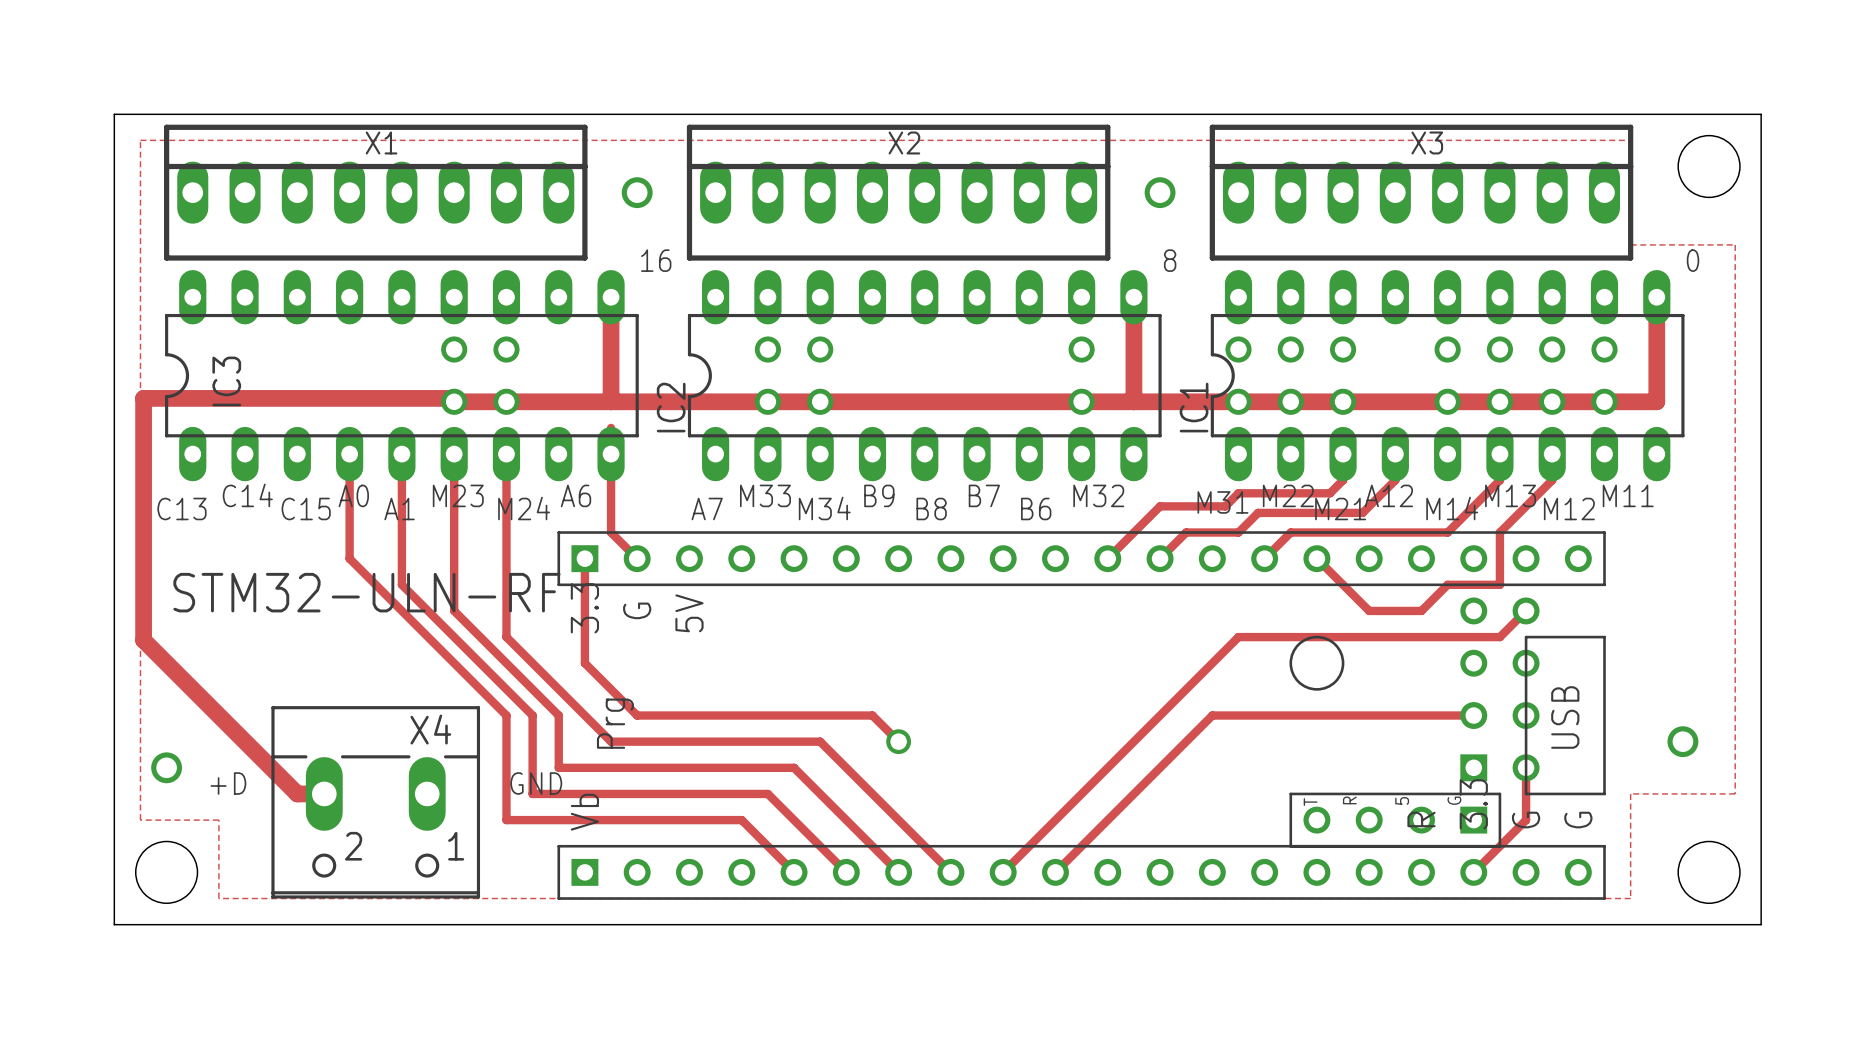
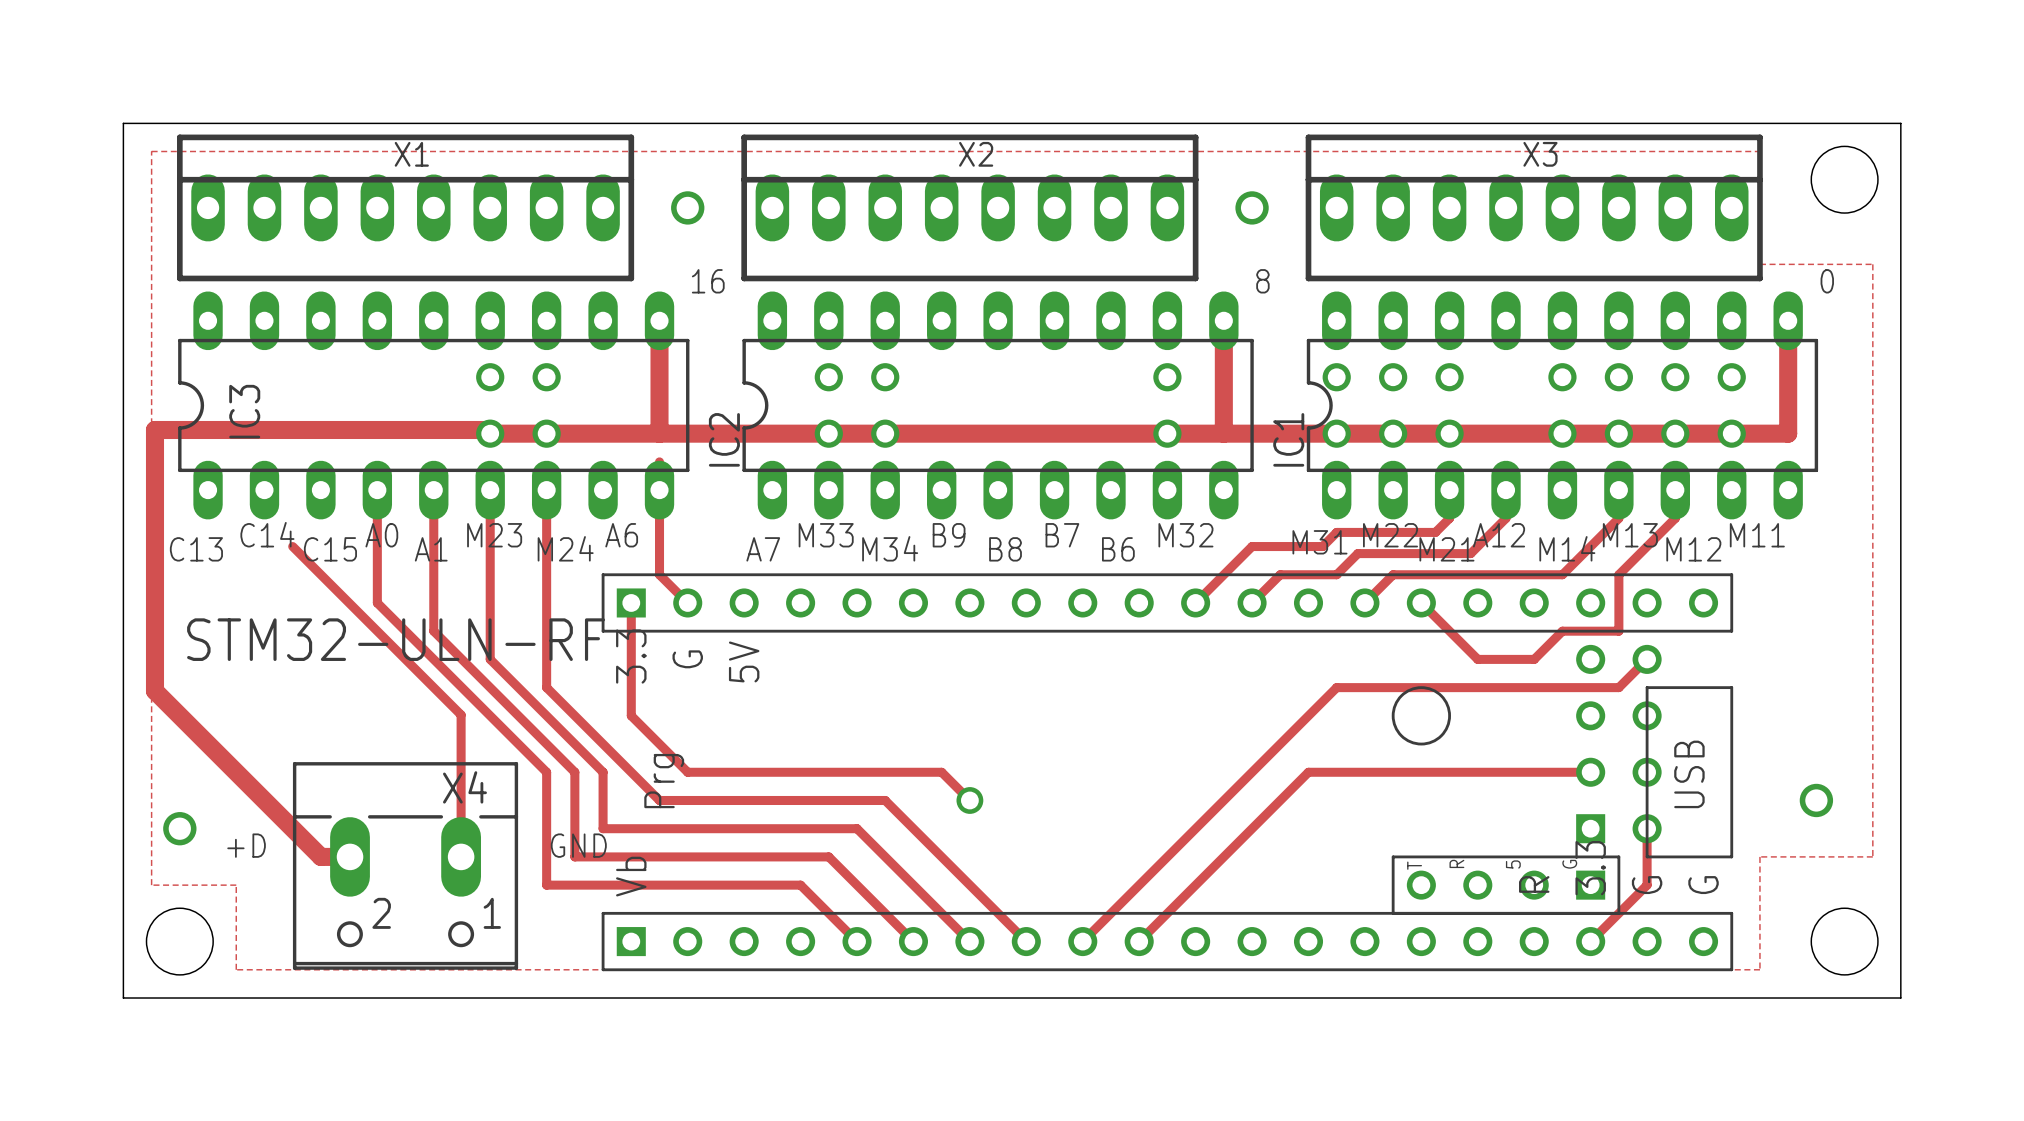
track: none -> (292, 546) (461, 714) (461, 856)

